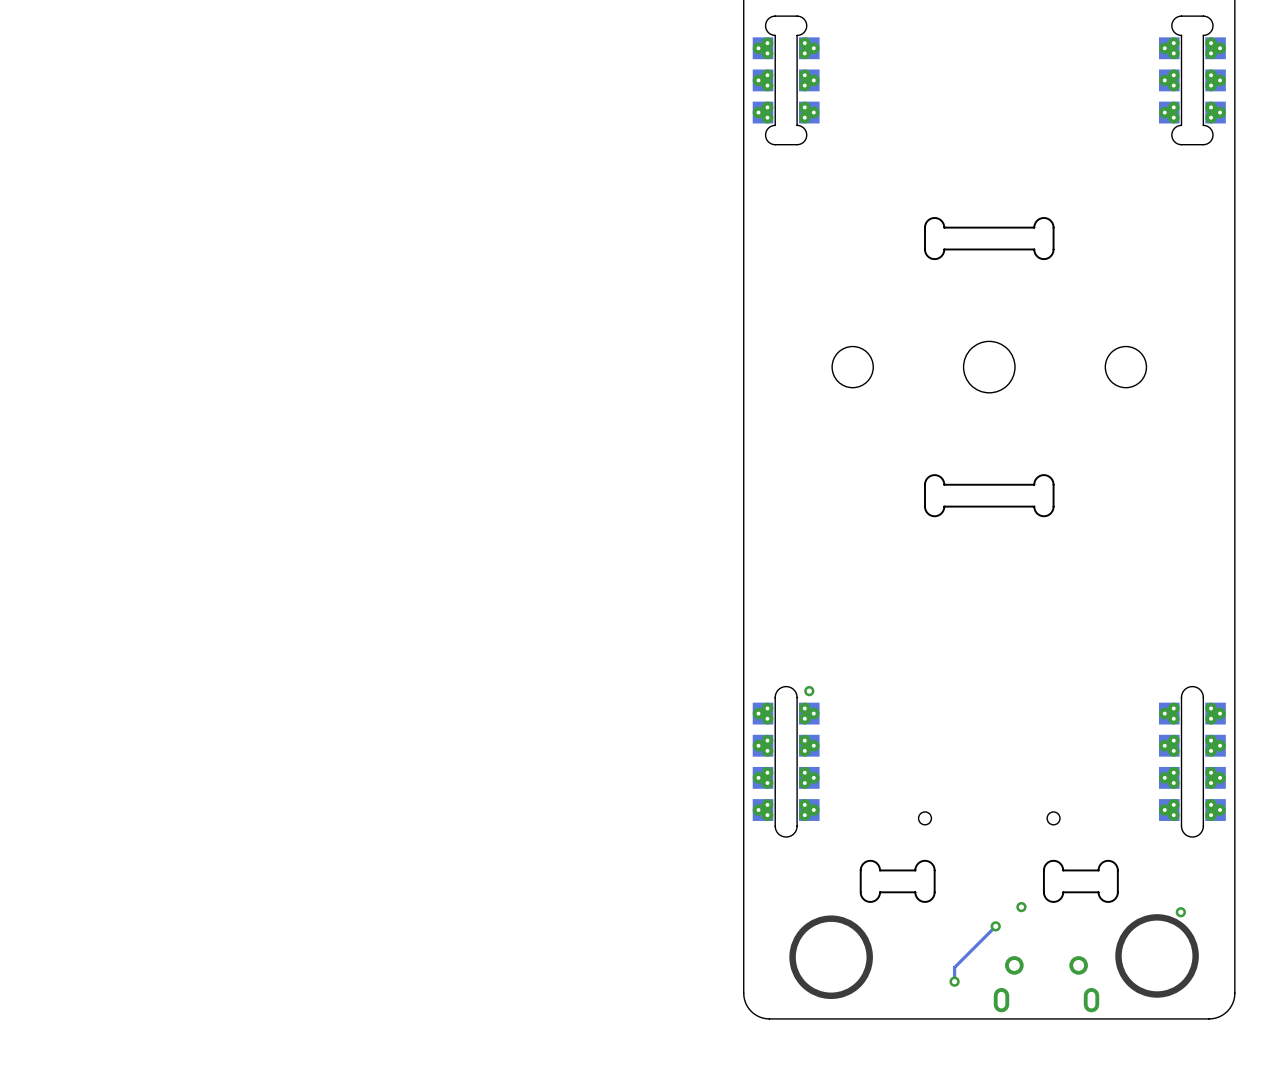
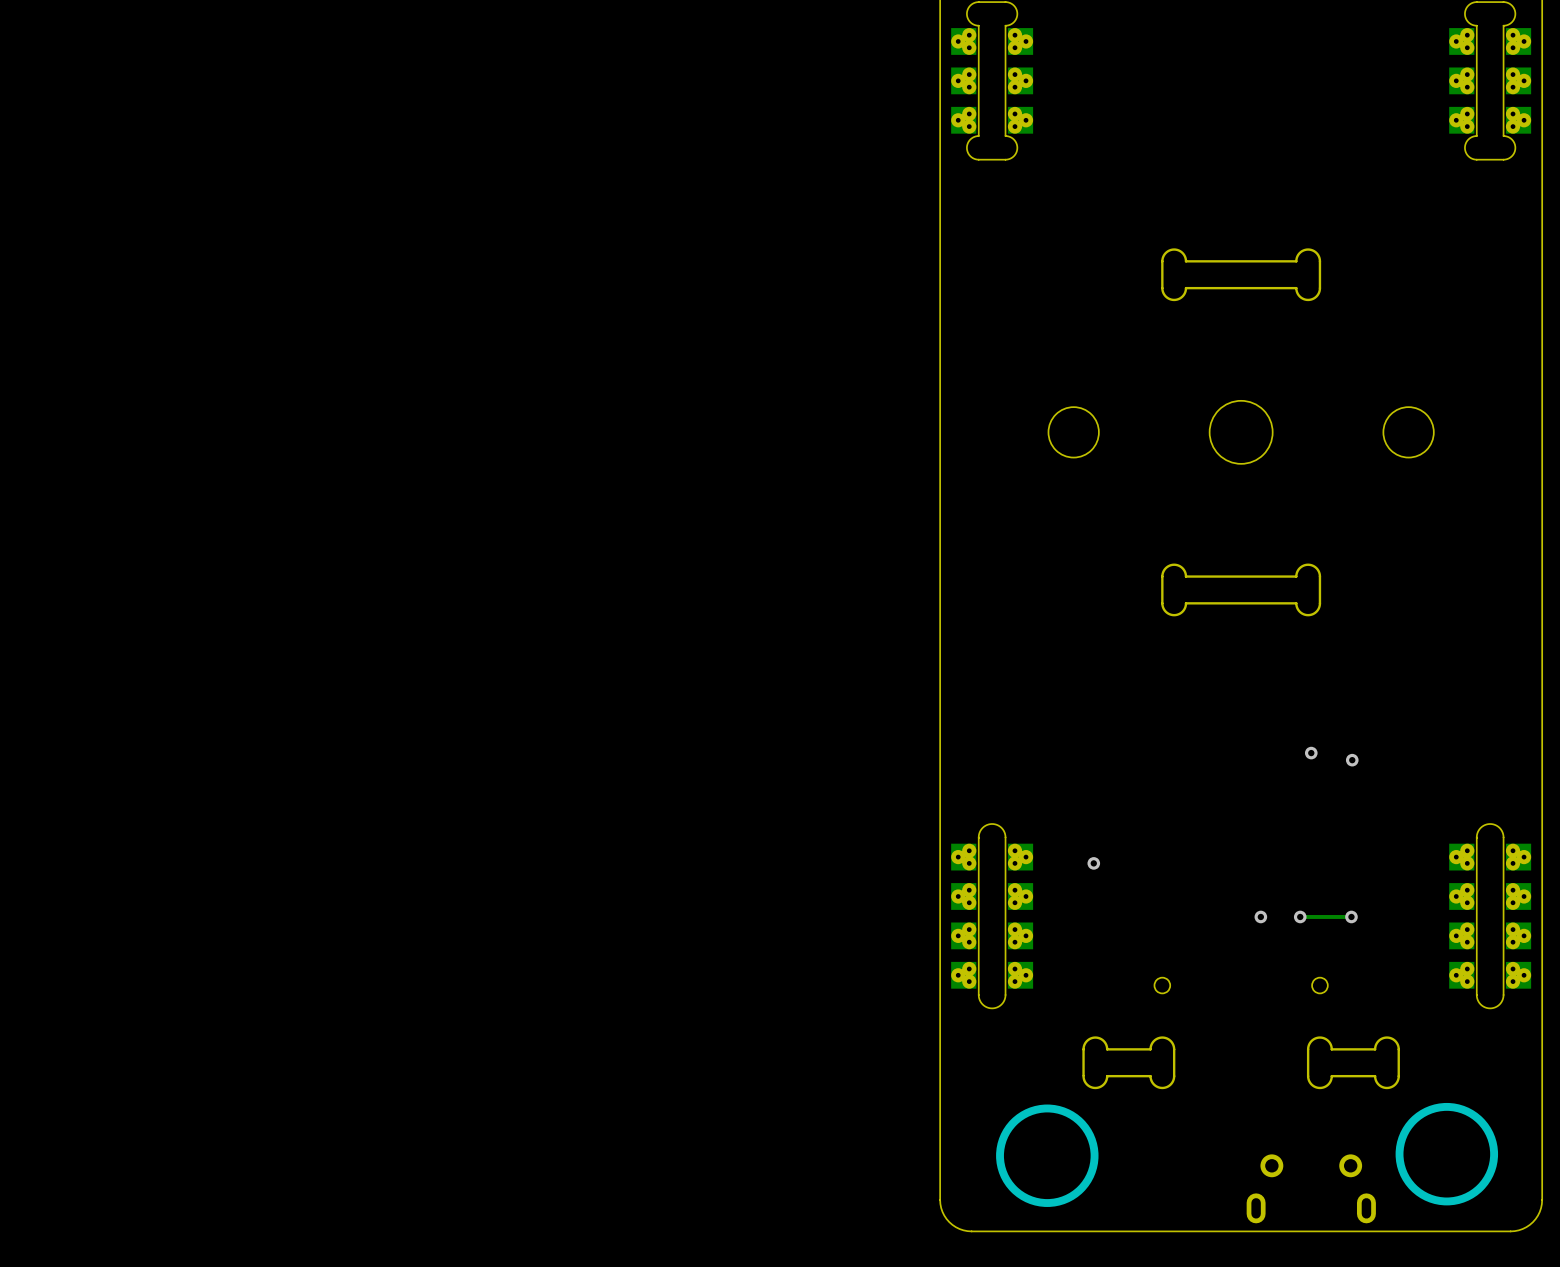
via: none -> (1311, 753)
via: none -> (1352, 760)
via position: (809, 691) -> (1093, 863)
via: none -> (1260, 916)
via: none -> (1300, 916)
track: none -> (1351, 916) (1300, 916)
via: none -> (1351, 916)
via: (1021, 907) -> none
via: (1180, 912) -> none
track: (995, 926) (954, 967) (954, 981) -> none
via: (995, 926) -> none
via: (954, 981) -> none

